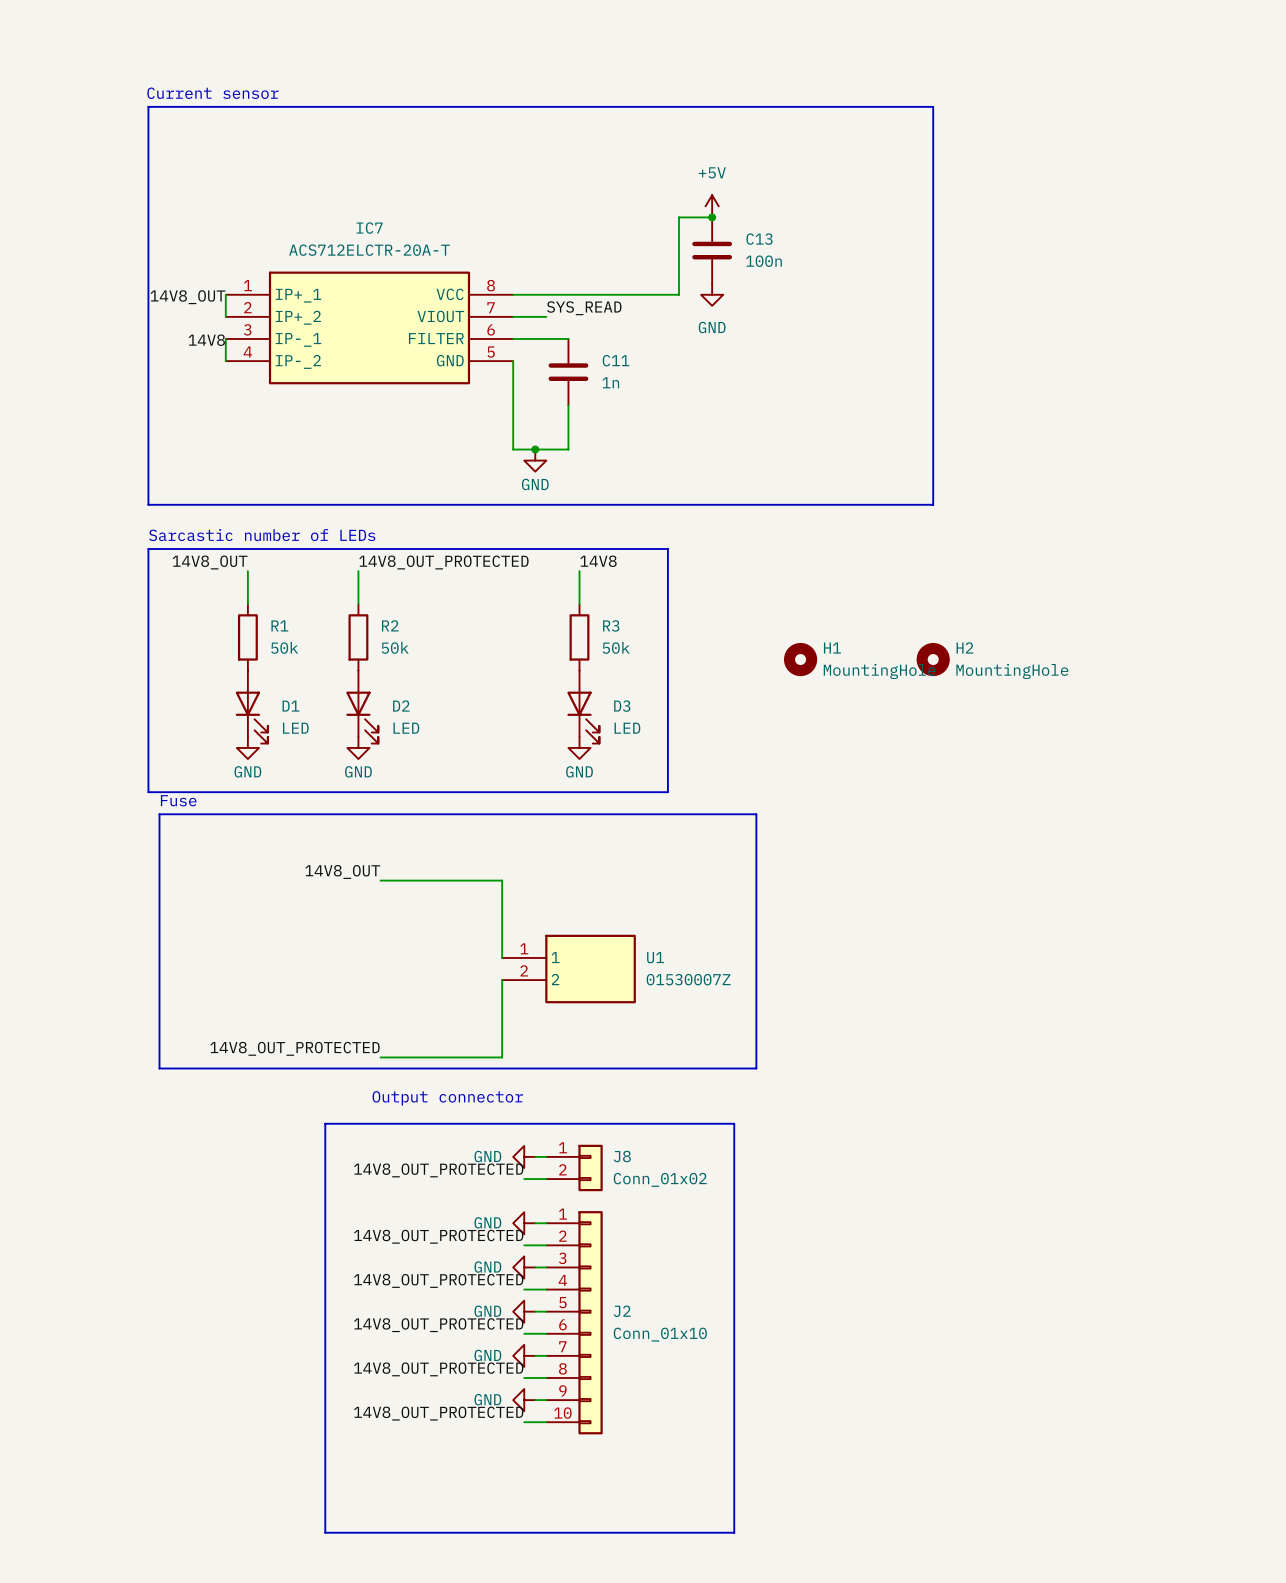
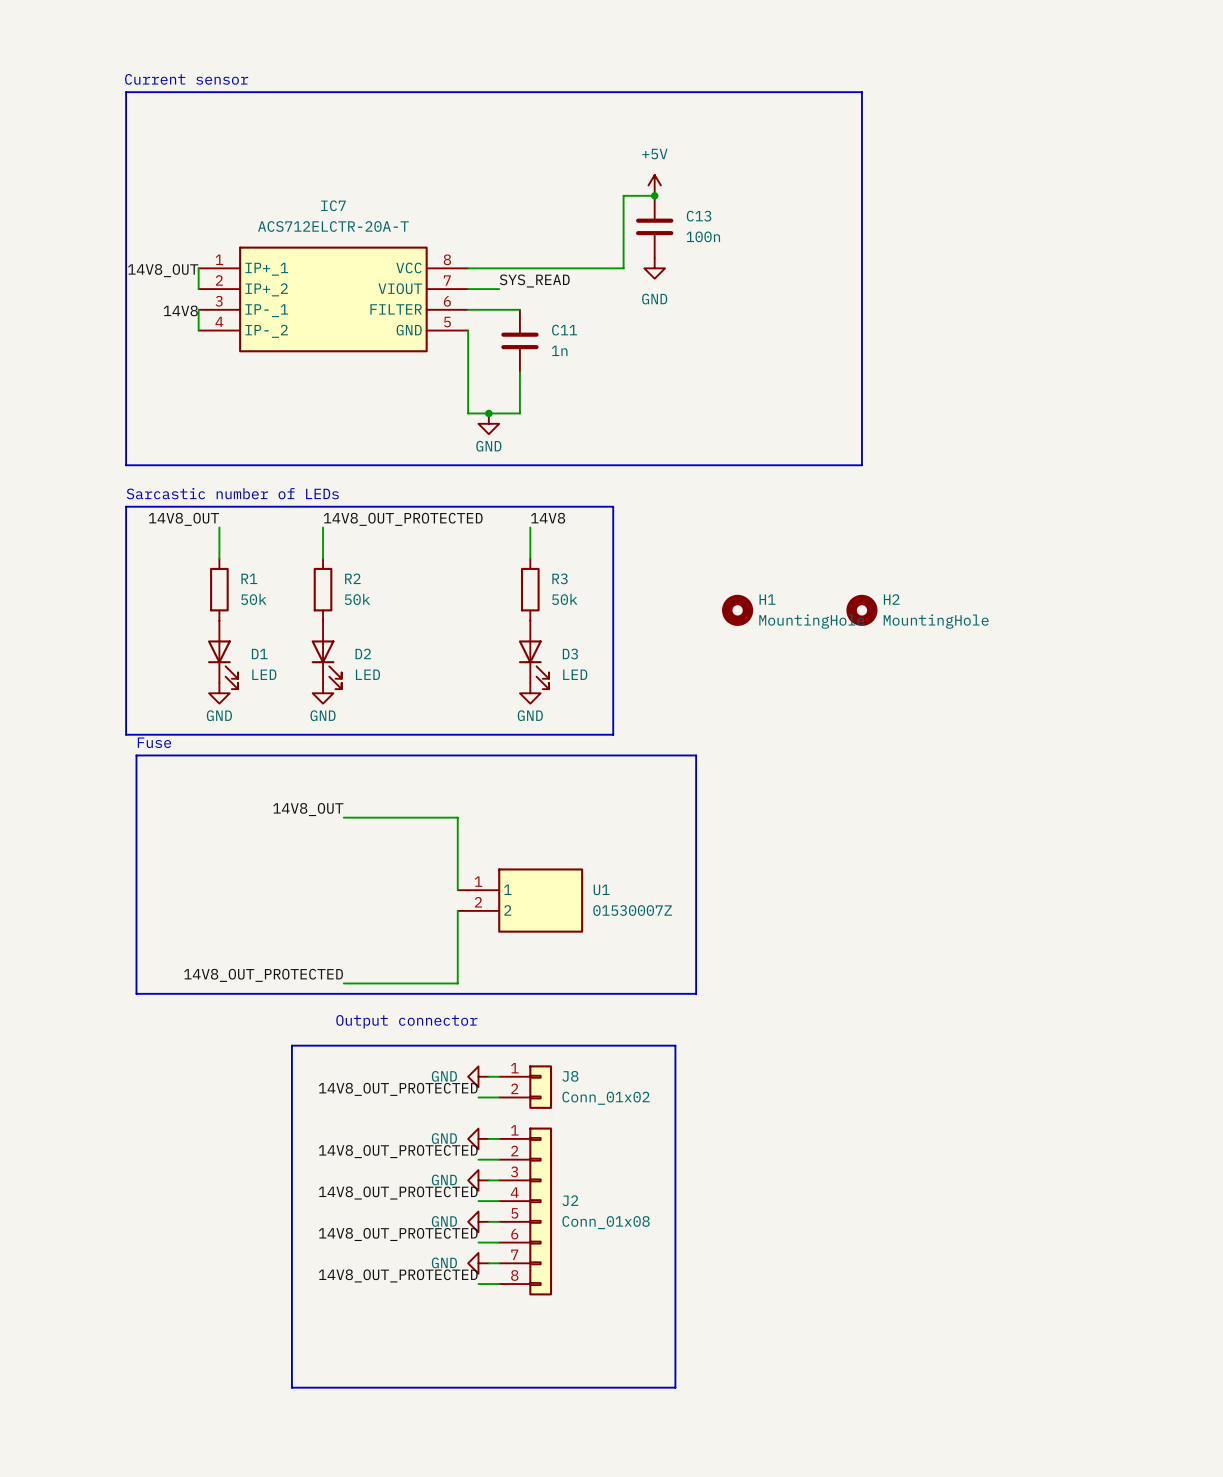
J2 symbol: [546, 1211, 603, 1435] -> [499, 1127, 553, 1296]
J2 value: Conn_01x10 (660, 1334) -> Conn_01x08 (606, 1222)
power symbol: GND (524, 1400) -> none
wire: (535, 1400) (546, 1400) -> none
label: 14V8_OUT_PROTECTED (438, 1413) -> none
wire: (524, 1422) (546, 1422) -> none
line: (325, 1488) (325, 1532) (734, 1532) (734, 1488) -> (291, 1387) (675, 1387)

